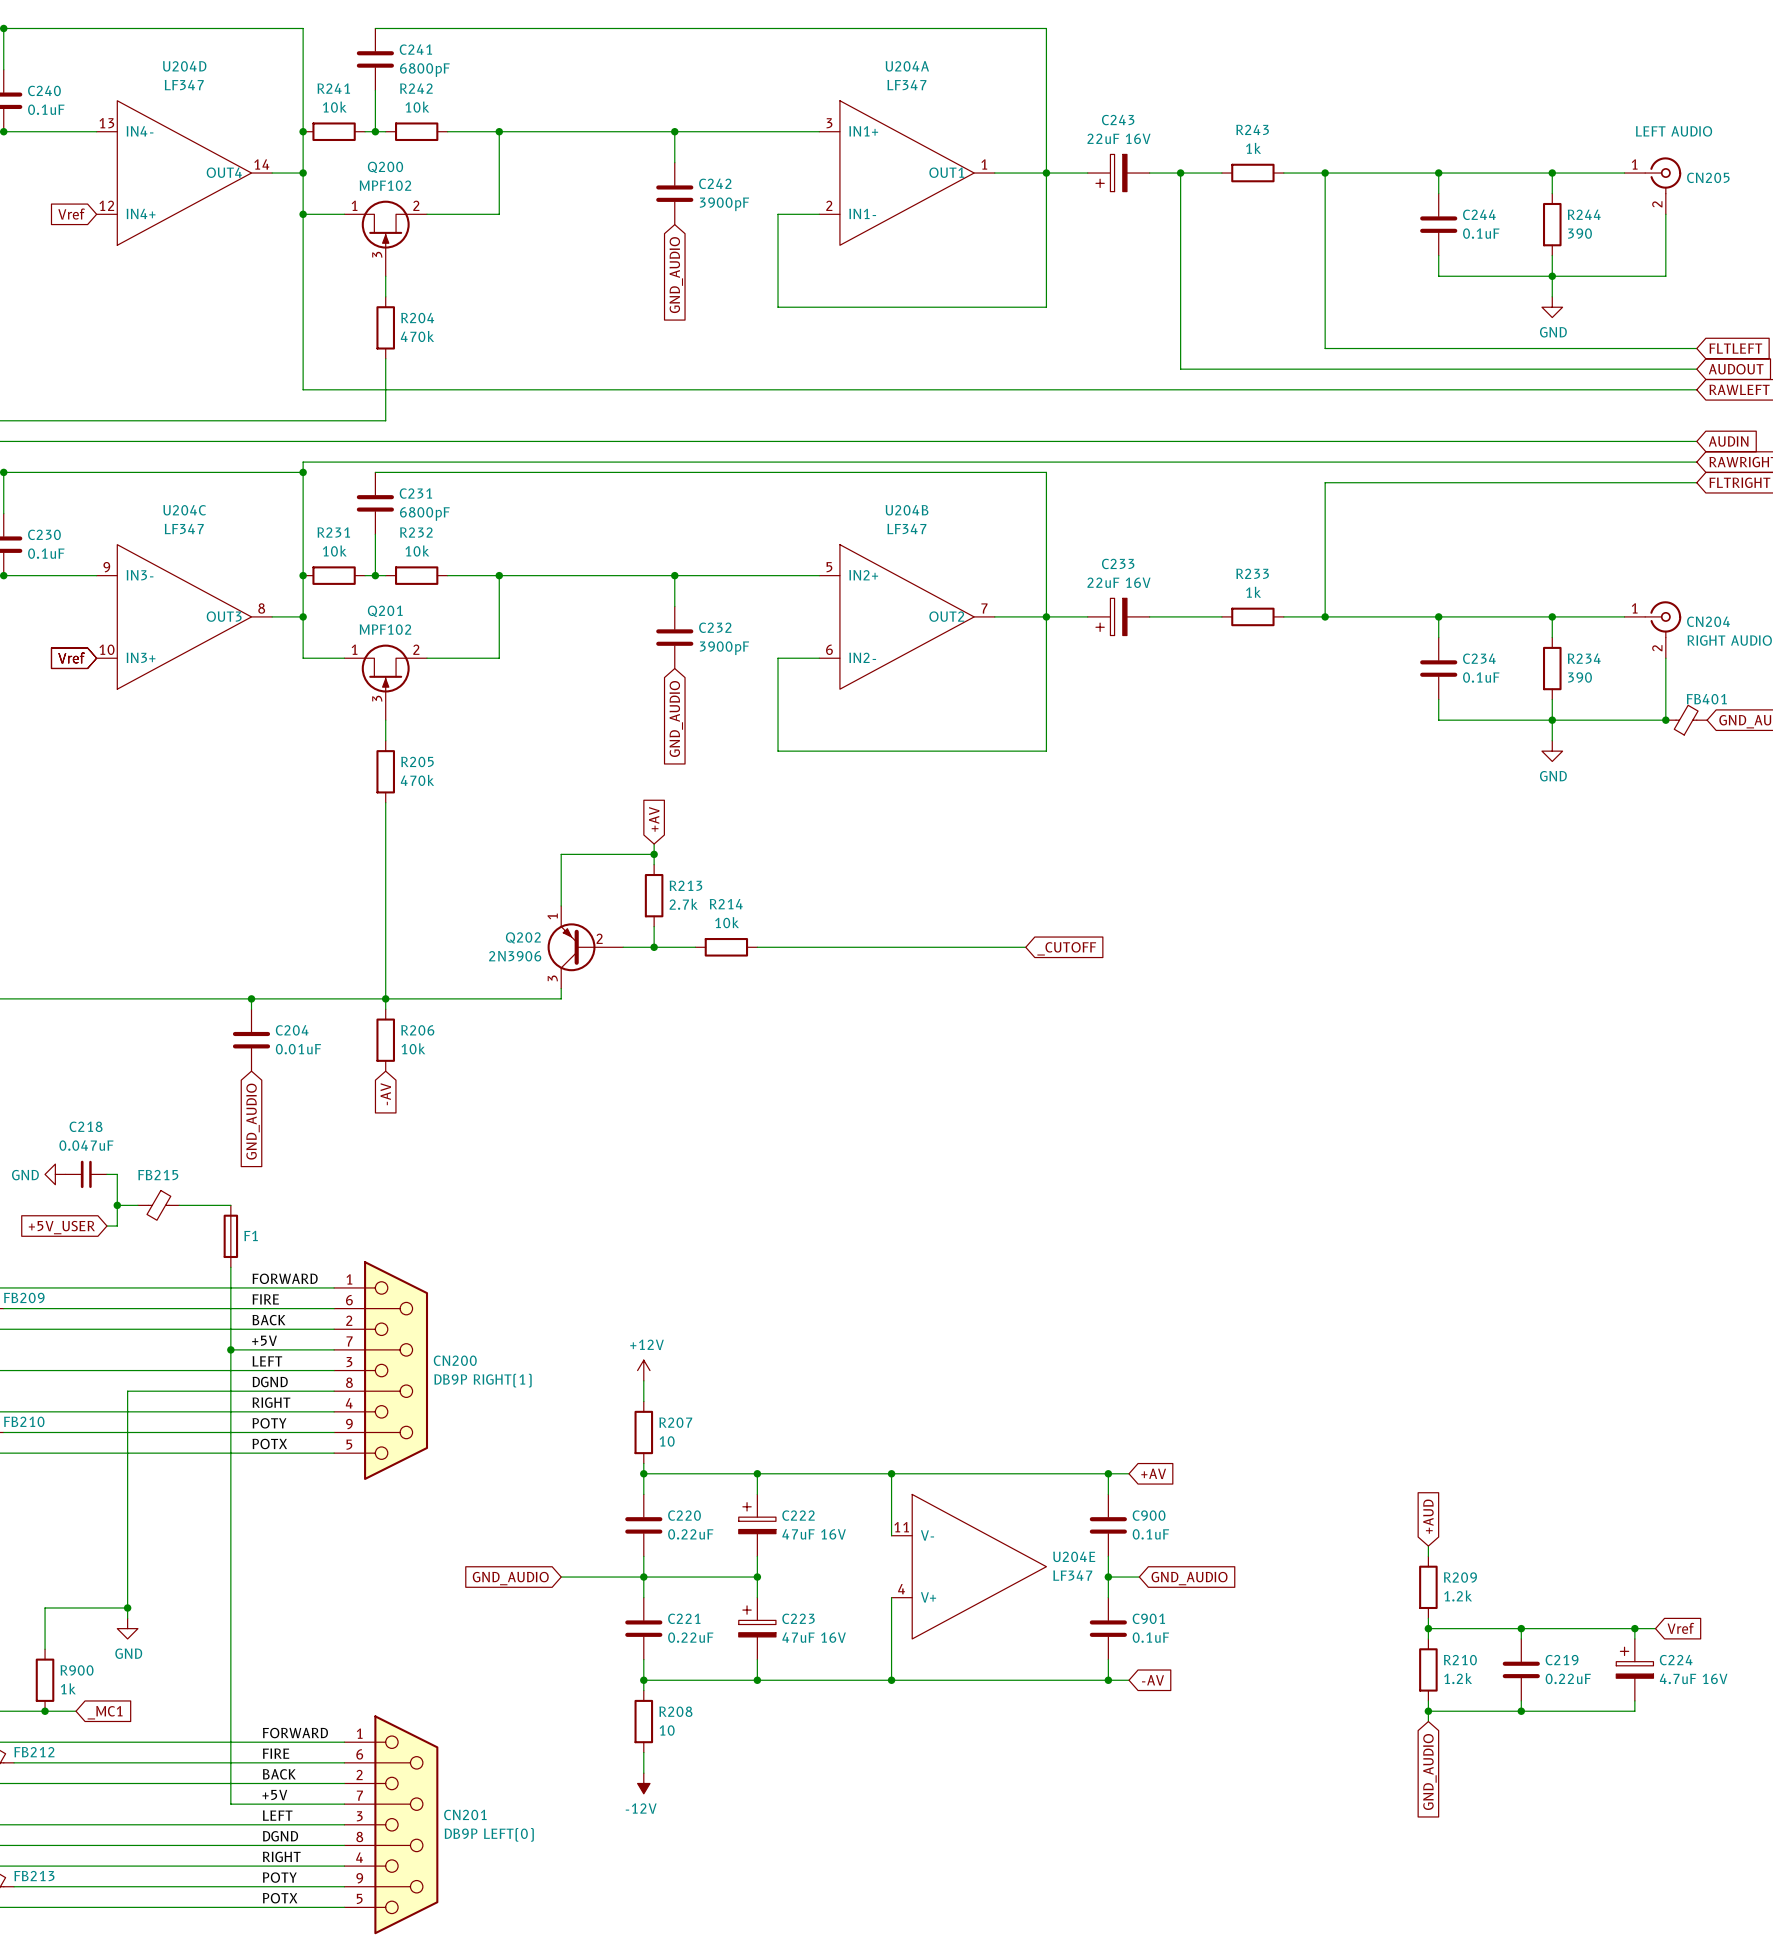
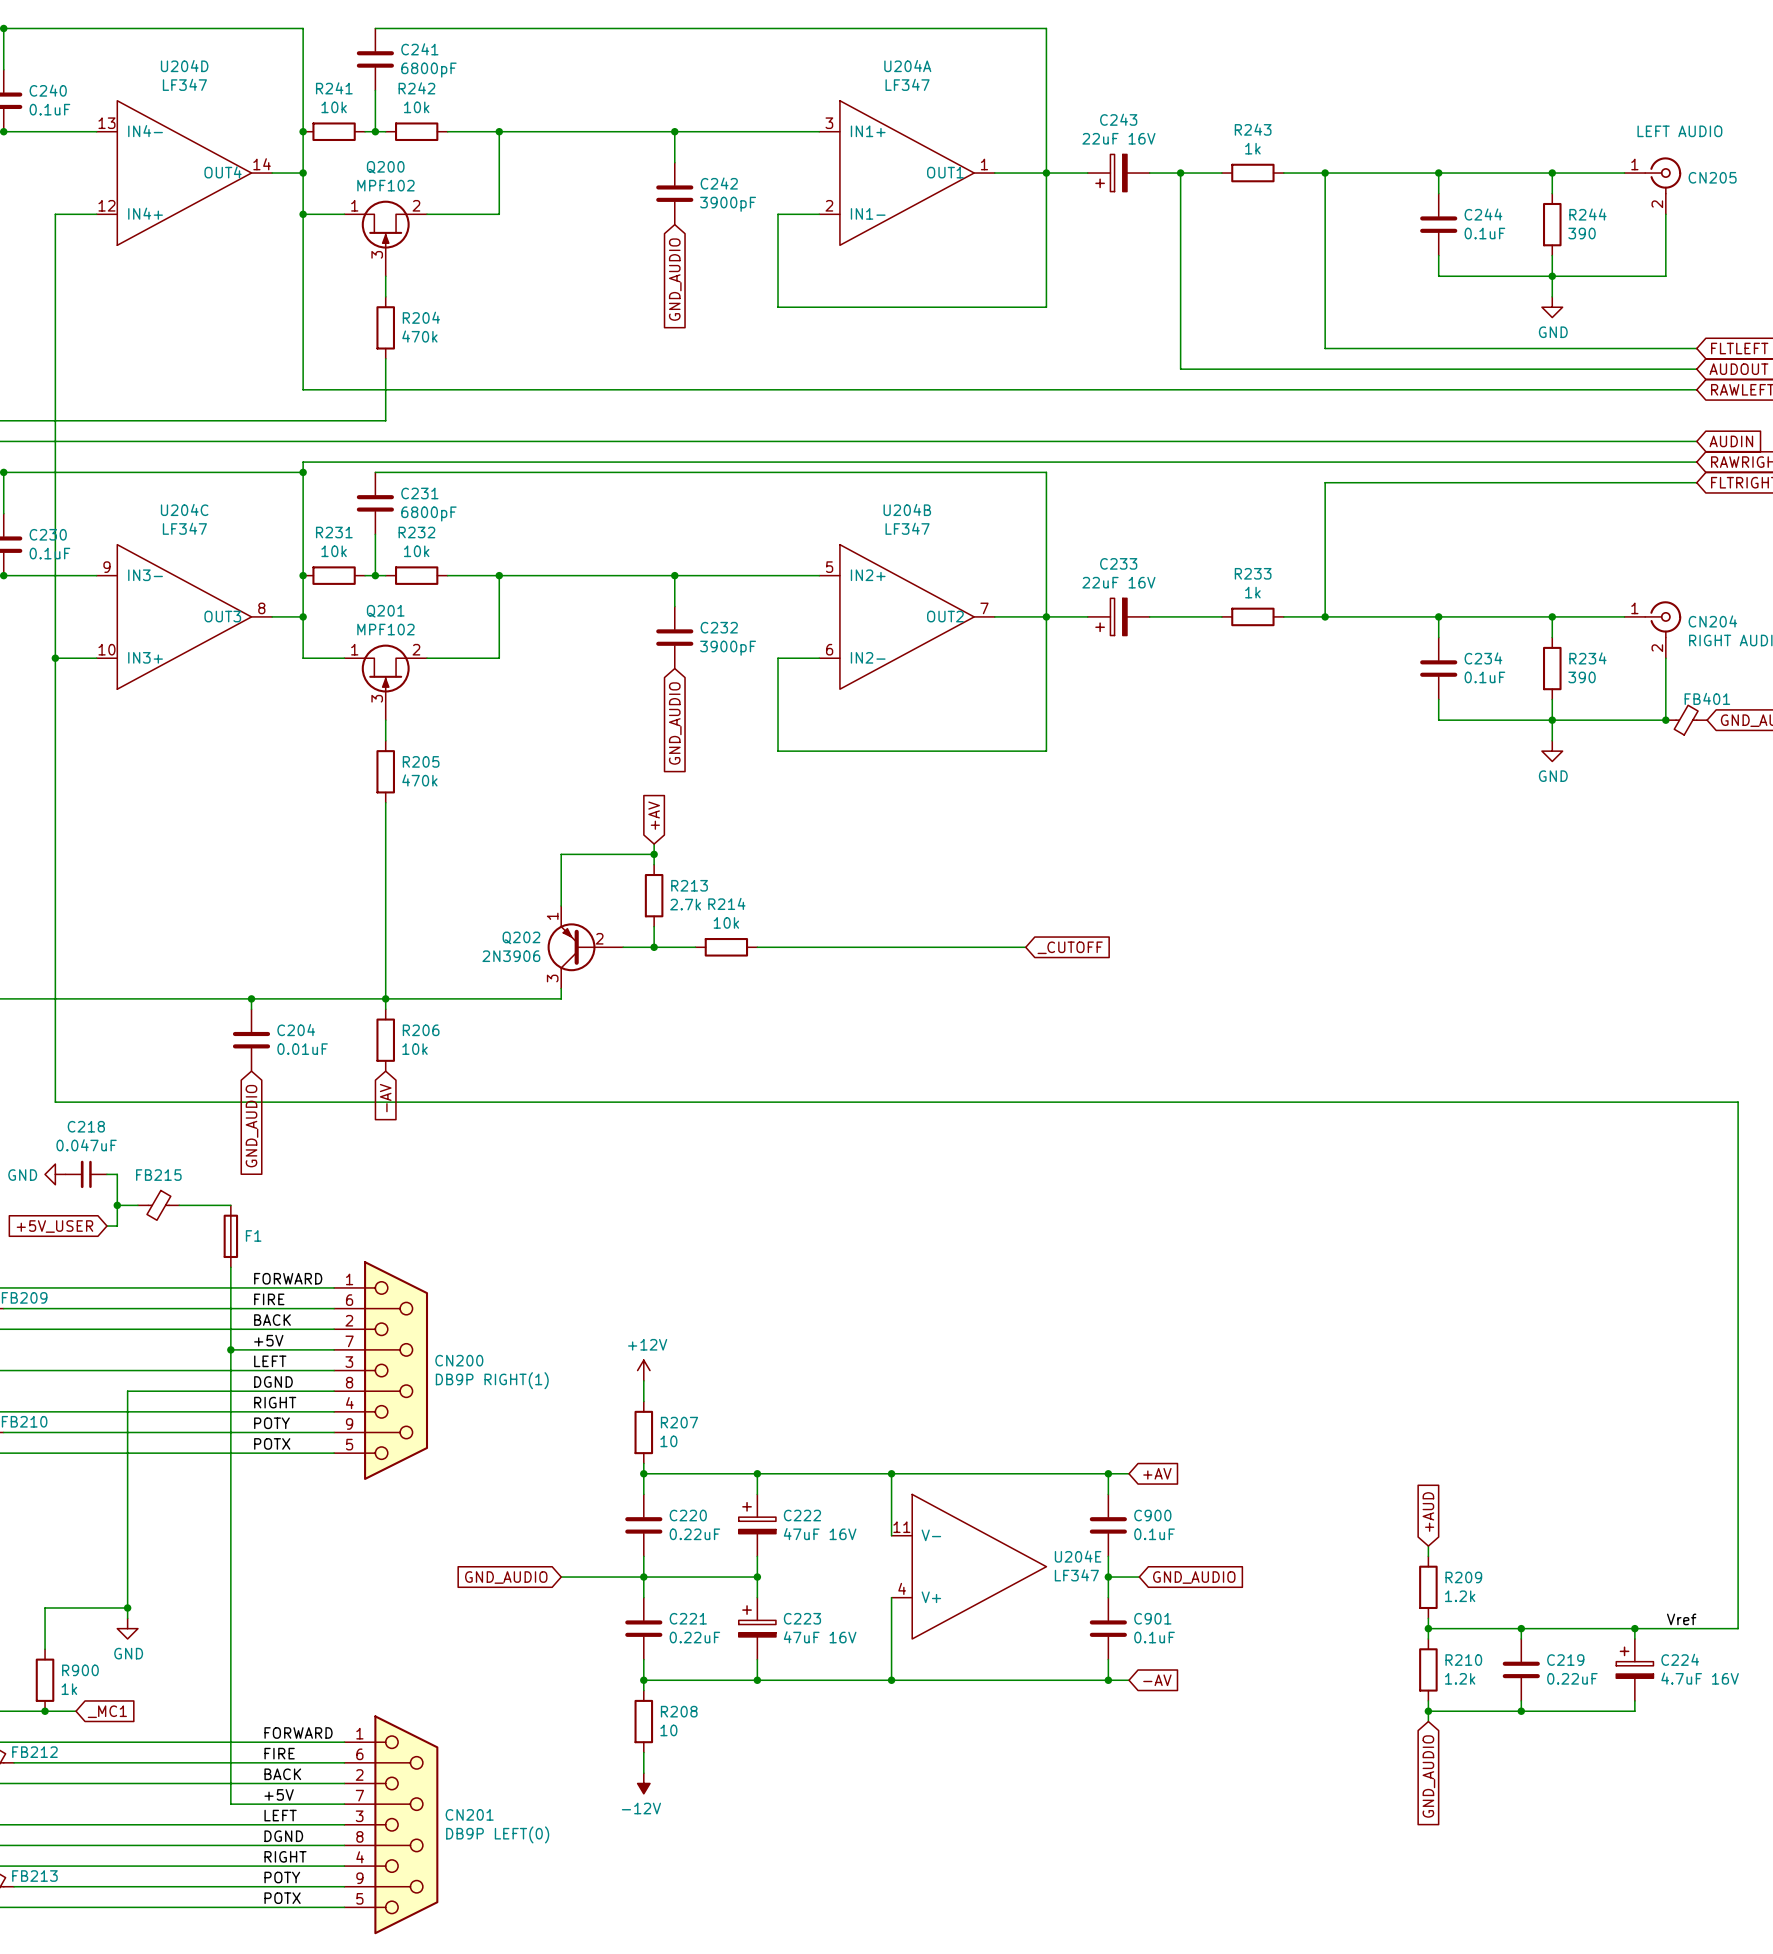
global label: Vref (71, 214) -> none
wire: none -> (96, 214) (55, 214) (55, 1102) (1738, 1102) (1738, 1628) (1655, 1628)
global label: Vref (71, 657) -> none
wire: none -> (55, 658) (96, 658)
junction: none -> (55, 658)
label: none -> Vref (1681, 1619)
global label: Vref (1680, 1628) -> none

